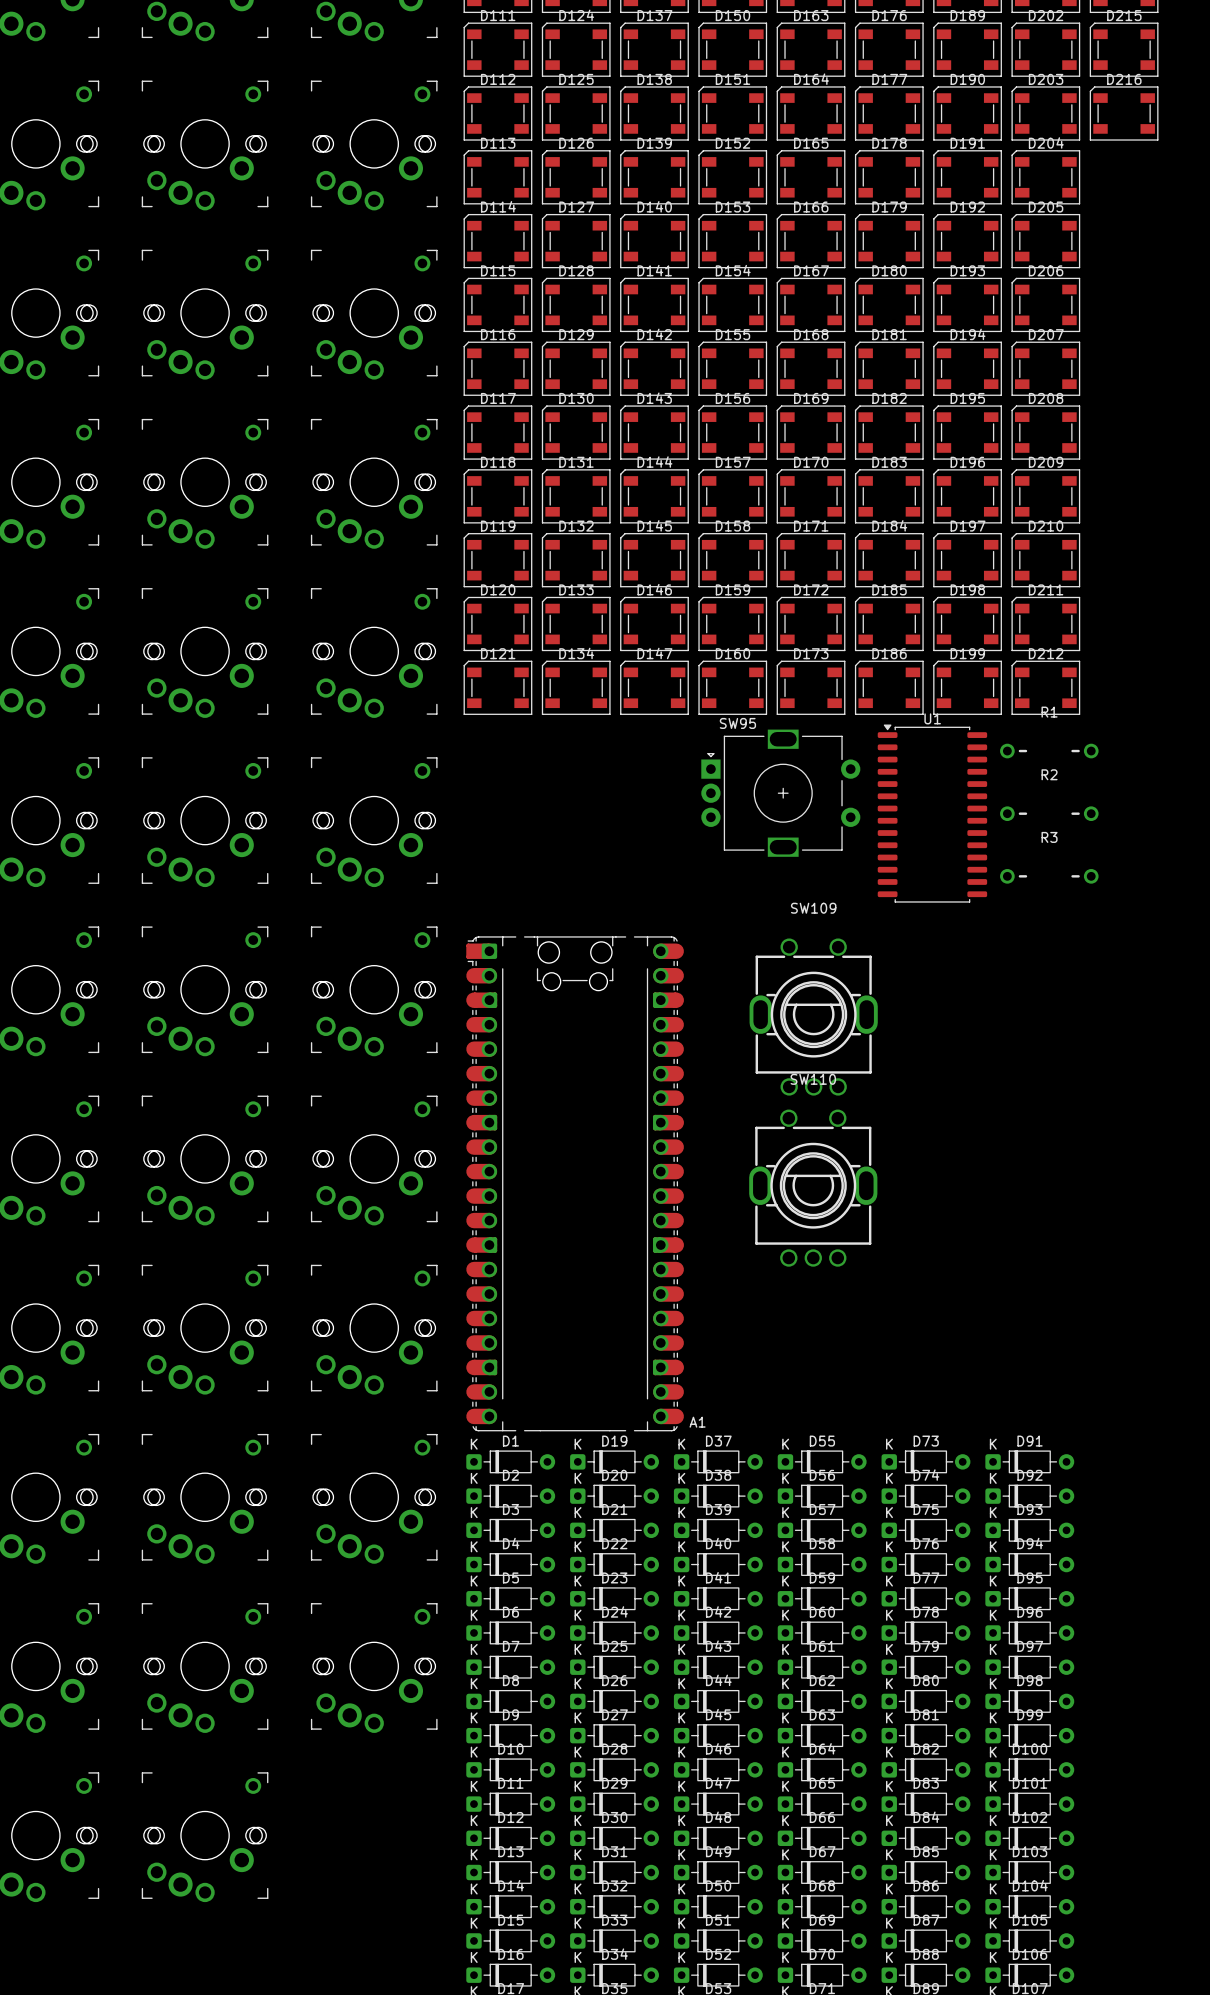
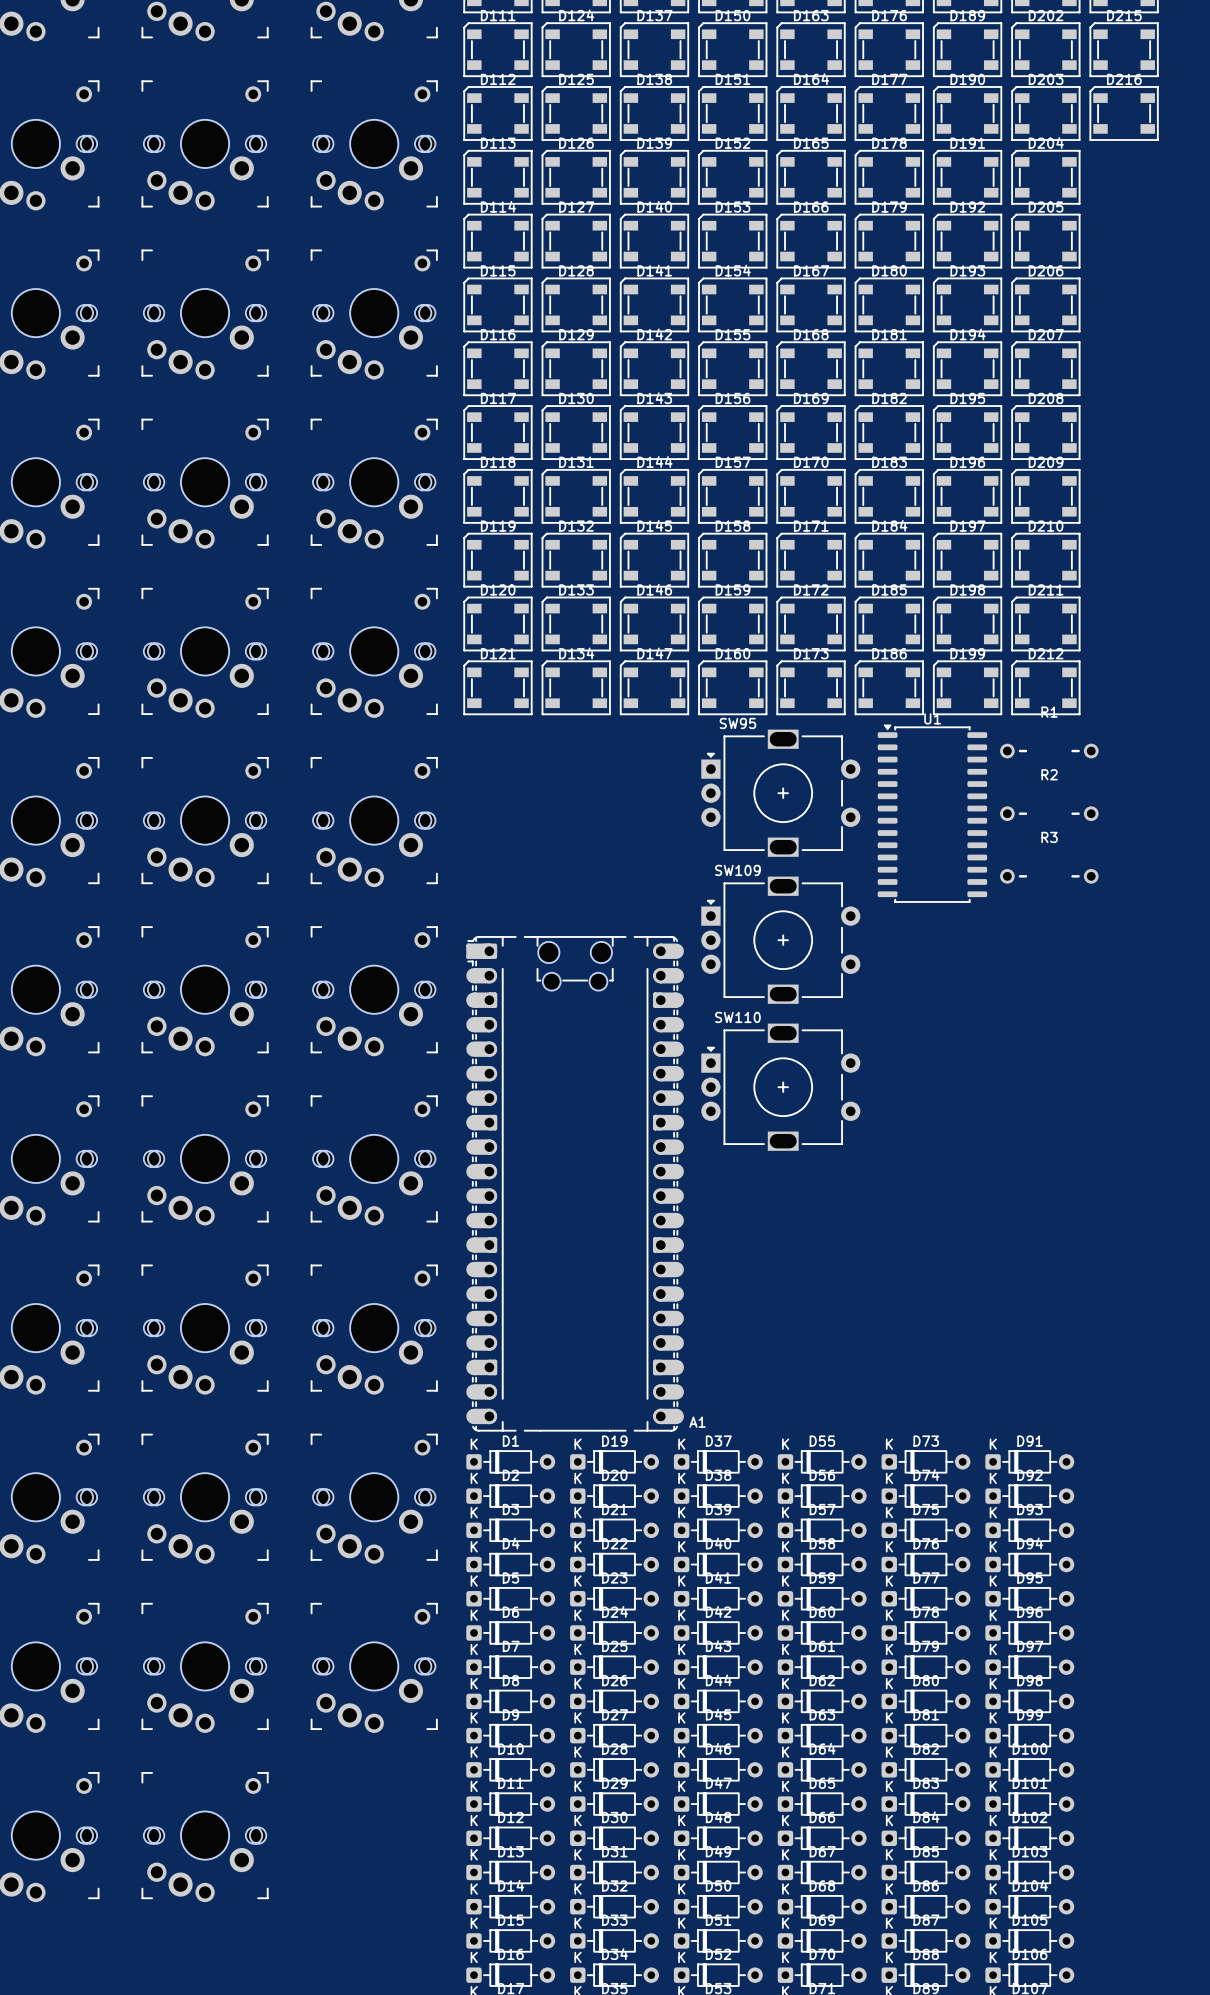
SW109 name position: SW109 (813, 908) -> SW109 (737, 870)
SW109 footprint: [749, 938, 878, 1096] -> [701, 876, 861, 1004]
SW110 name position: SW110 (813, 1079) -> SW110 (737, 1017)
SW110 footprint: [749, 1109, 878, 1267] -> [701, 1023, 861, 1151]

